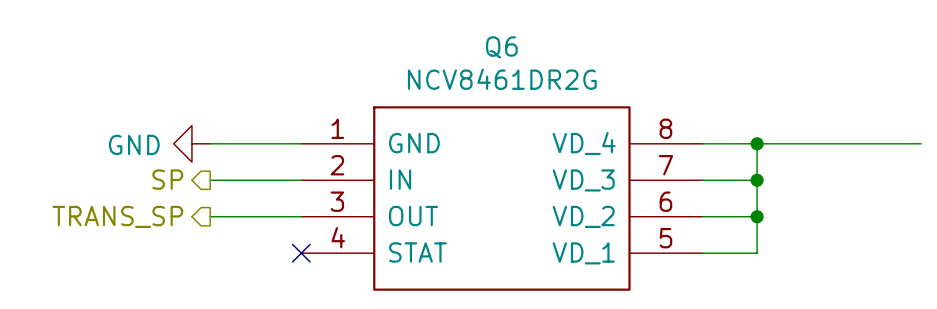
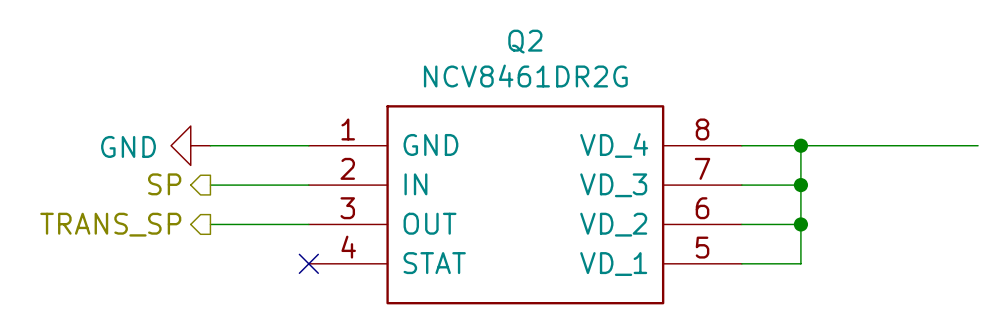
Q6 name: Q6 (501, 47) -> Q2 (525, 41)

